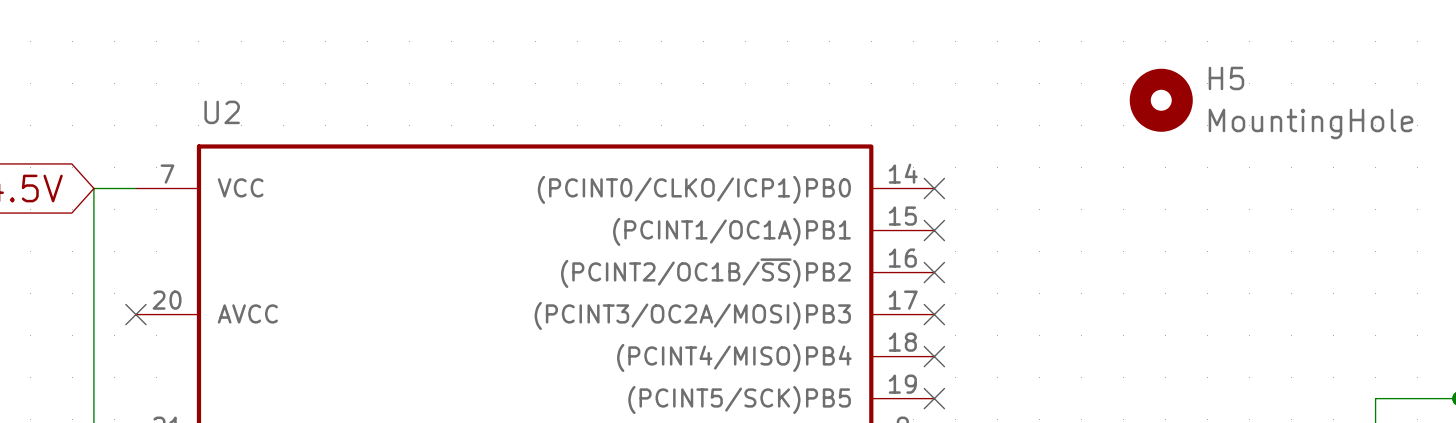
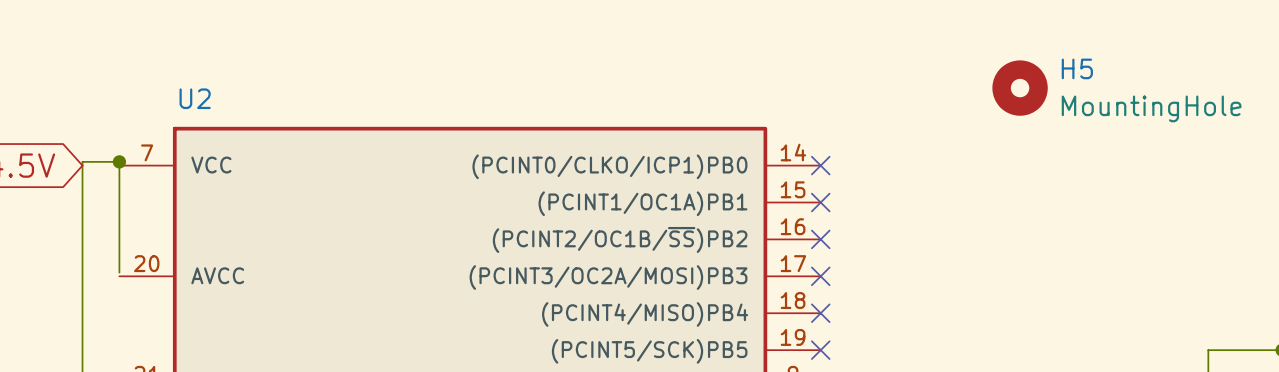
junction: none -> (119, 161)
wire: (93, 188) (135, 188) -> (82, 165) (82, 161) (119, 161) (119, 272)
no-connect mark: (135, 314) -> none

